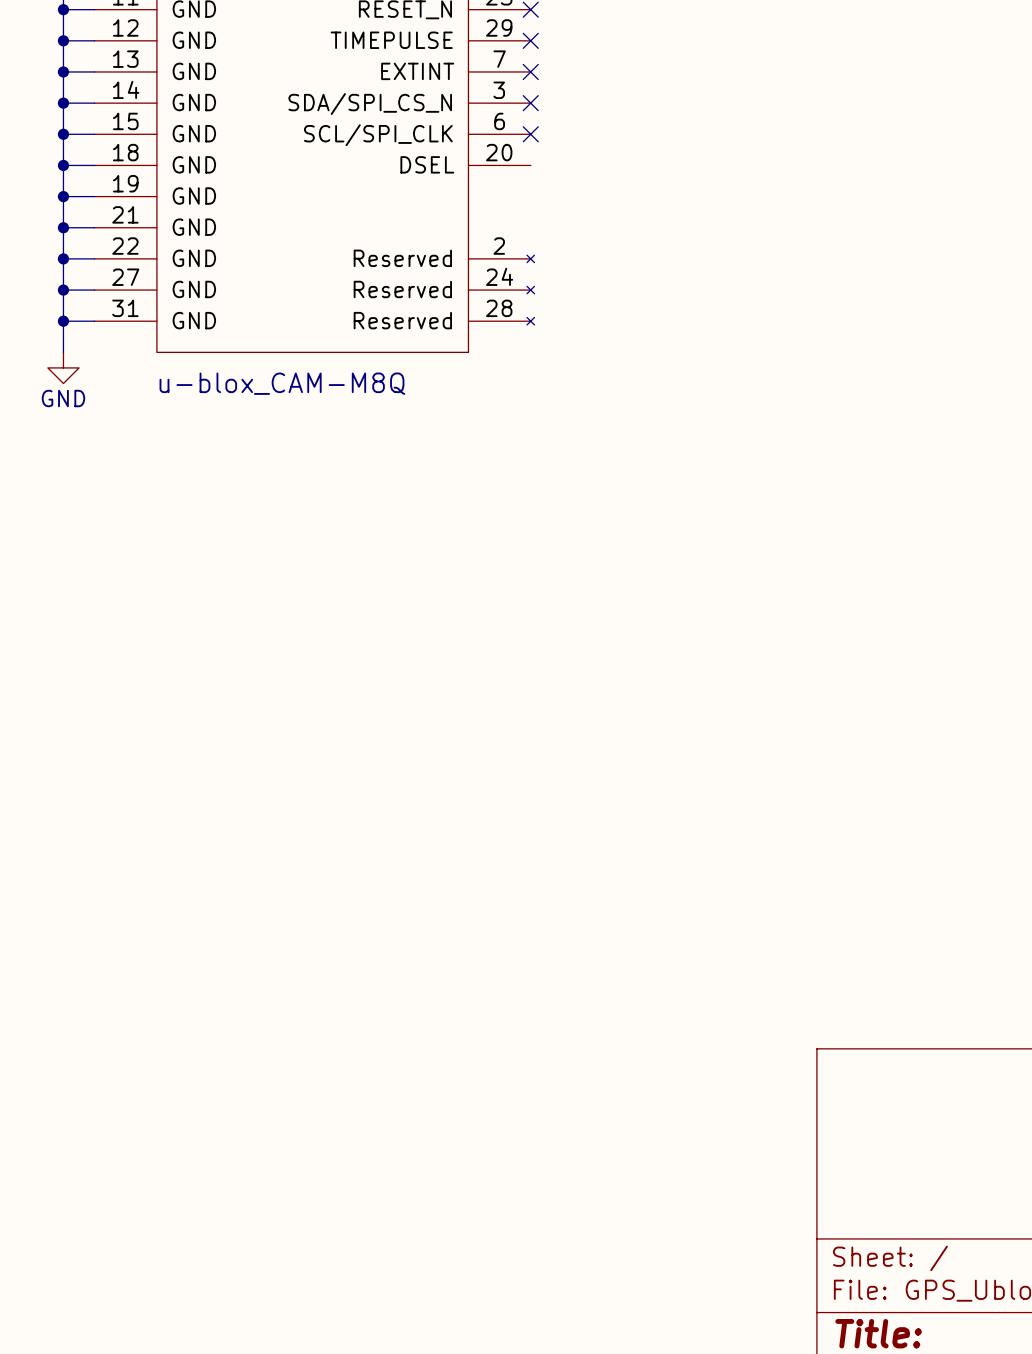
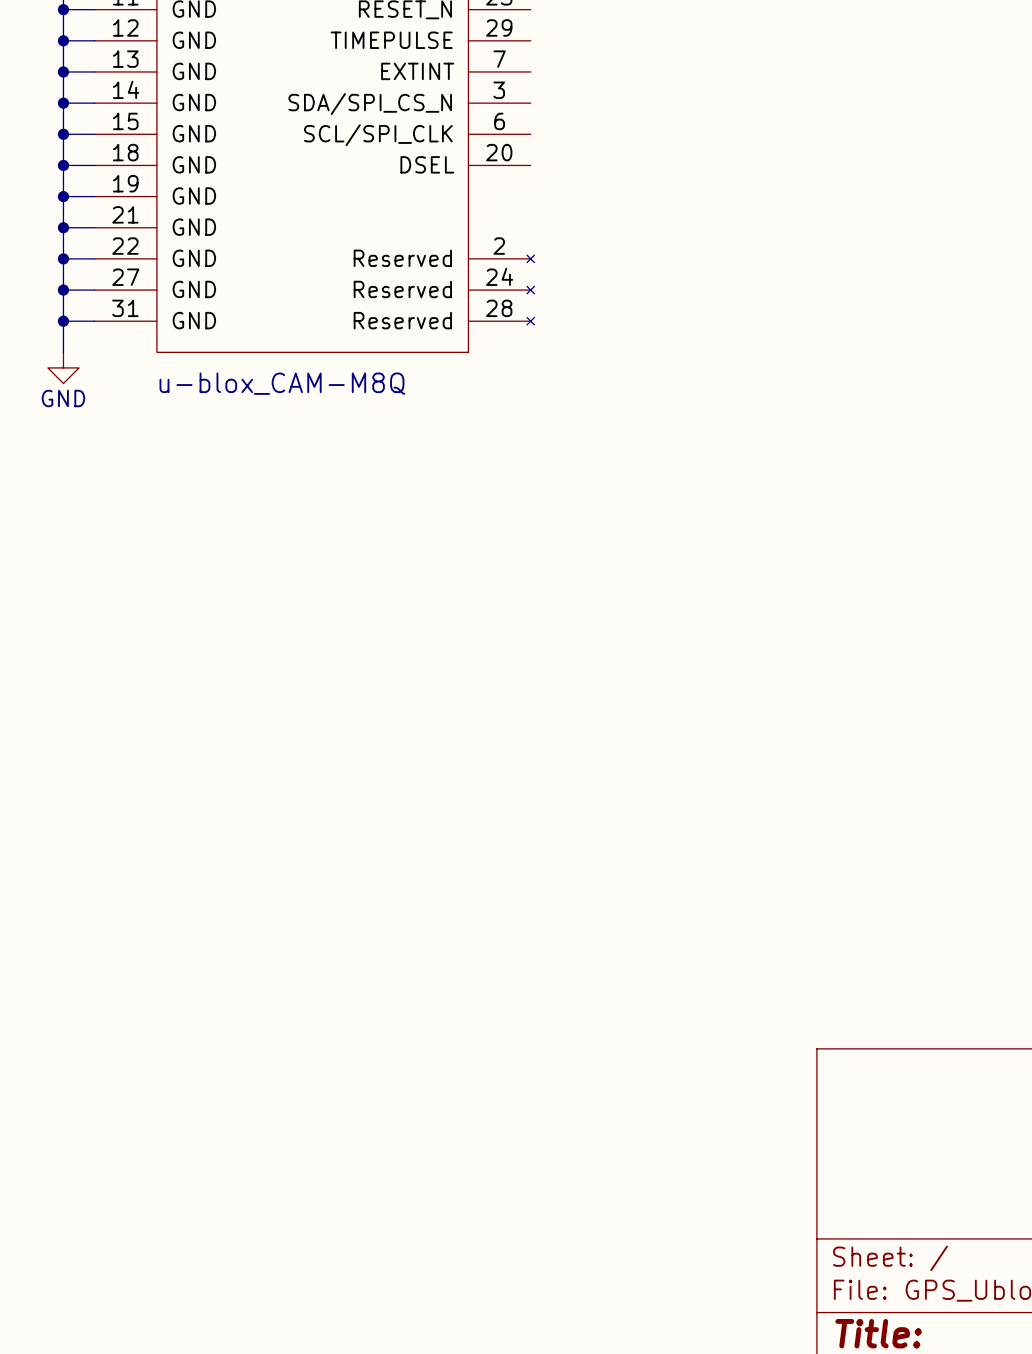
no-connect mark: (530, 9) -> none
no-connect mark: (530, 40) -> none
no-connect mark: (530, 71) -> none
no-connect mark: (530, 103) -> none
no-connect mark: (530, 134) -> none

